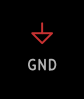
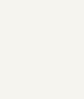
power symbol: GND (42, 33) -> none

